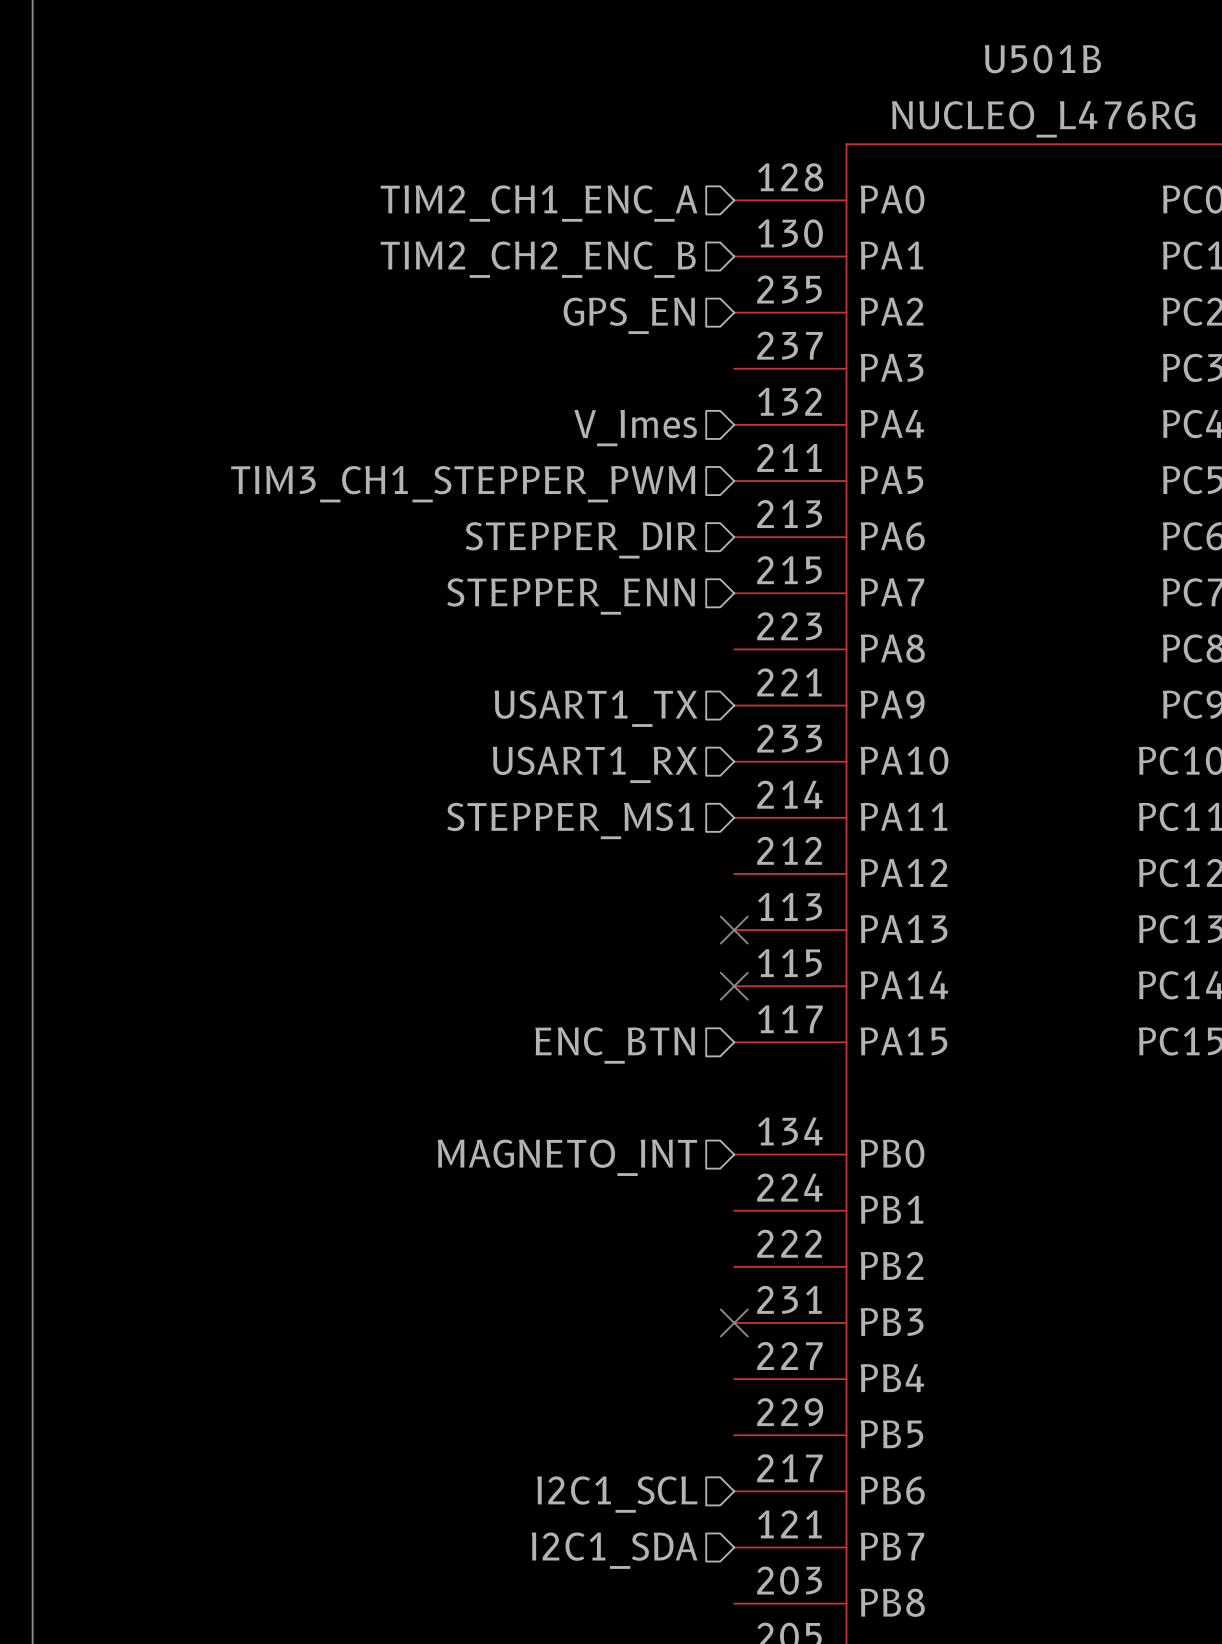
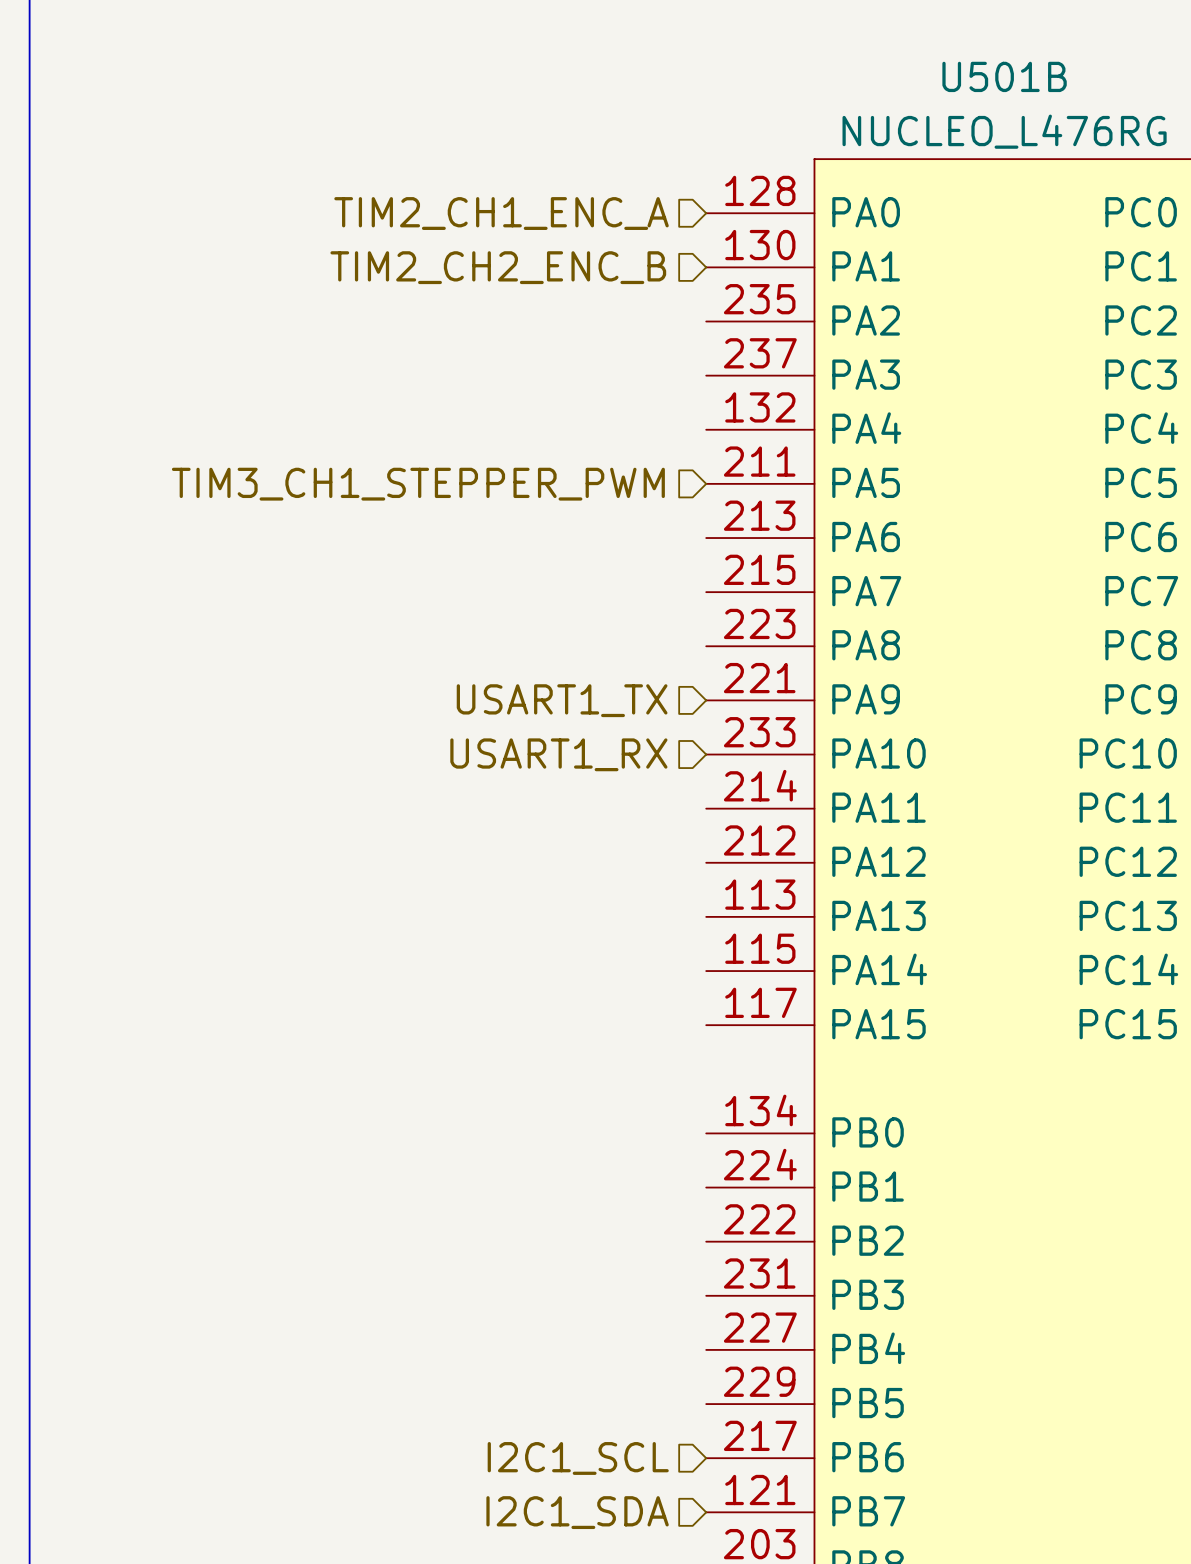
hierarchical label: GPS_EN (629, 315) -> none
hierarchical label: V_Imes (635, 428) -> none
hierarchical label: STEPPER_DIR (581, 540) -> none
hierarchical label: STEPPER_ENN (571, 596) -> none
hierarchical label: STEPPER_MS1 (570, 820) -> none
no-connect mark: (734, 930) -> none
no-connect mark: (734, 986) -> none
hierarchical label: ENC_BTN (615, 1045) -> none
hierarchical label: MAGNETO_INT (567, 1157) -> none
no-connect mark: (734, 1322) -> none

